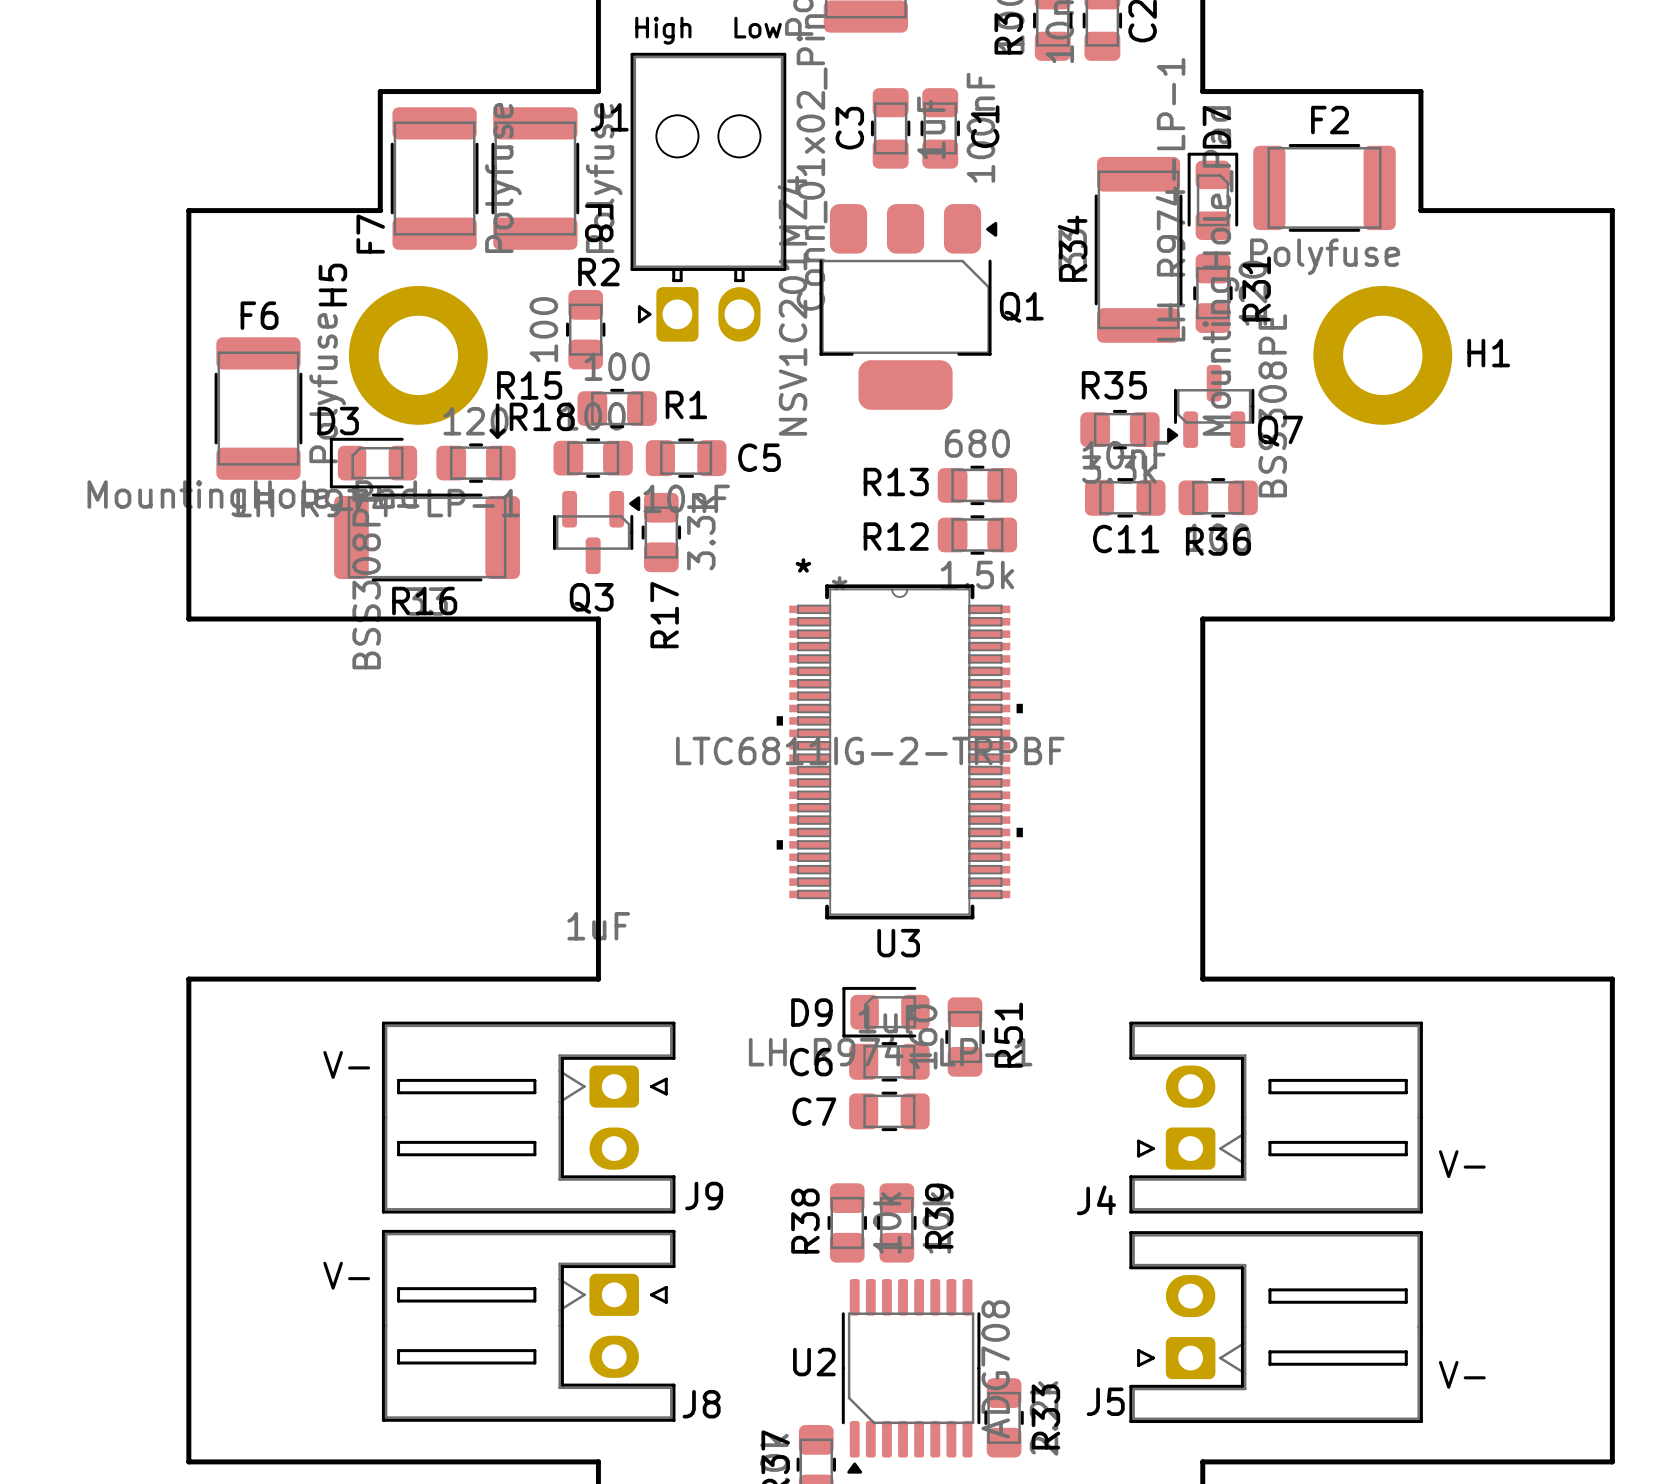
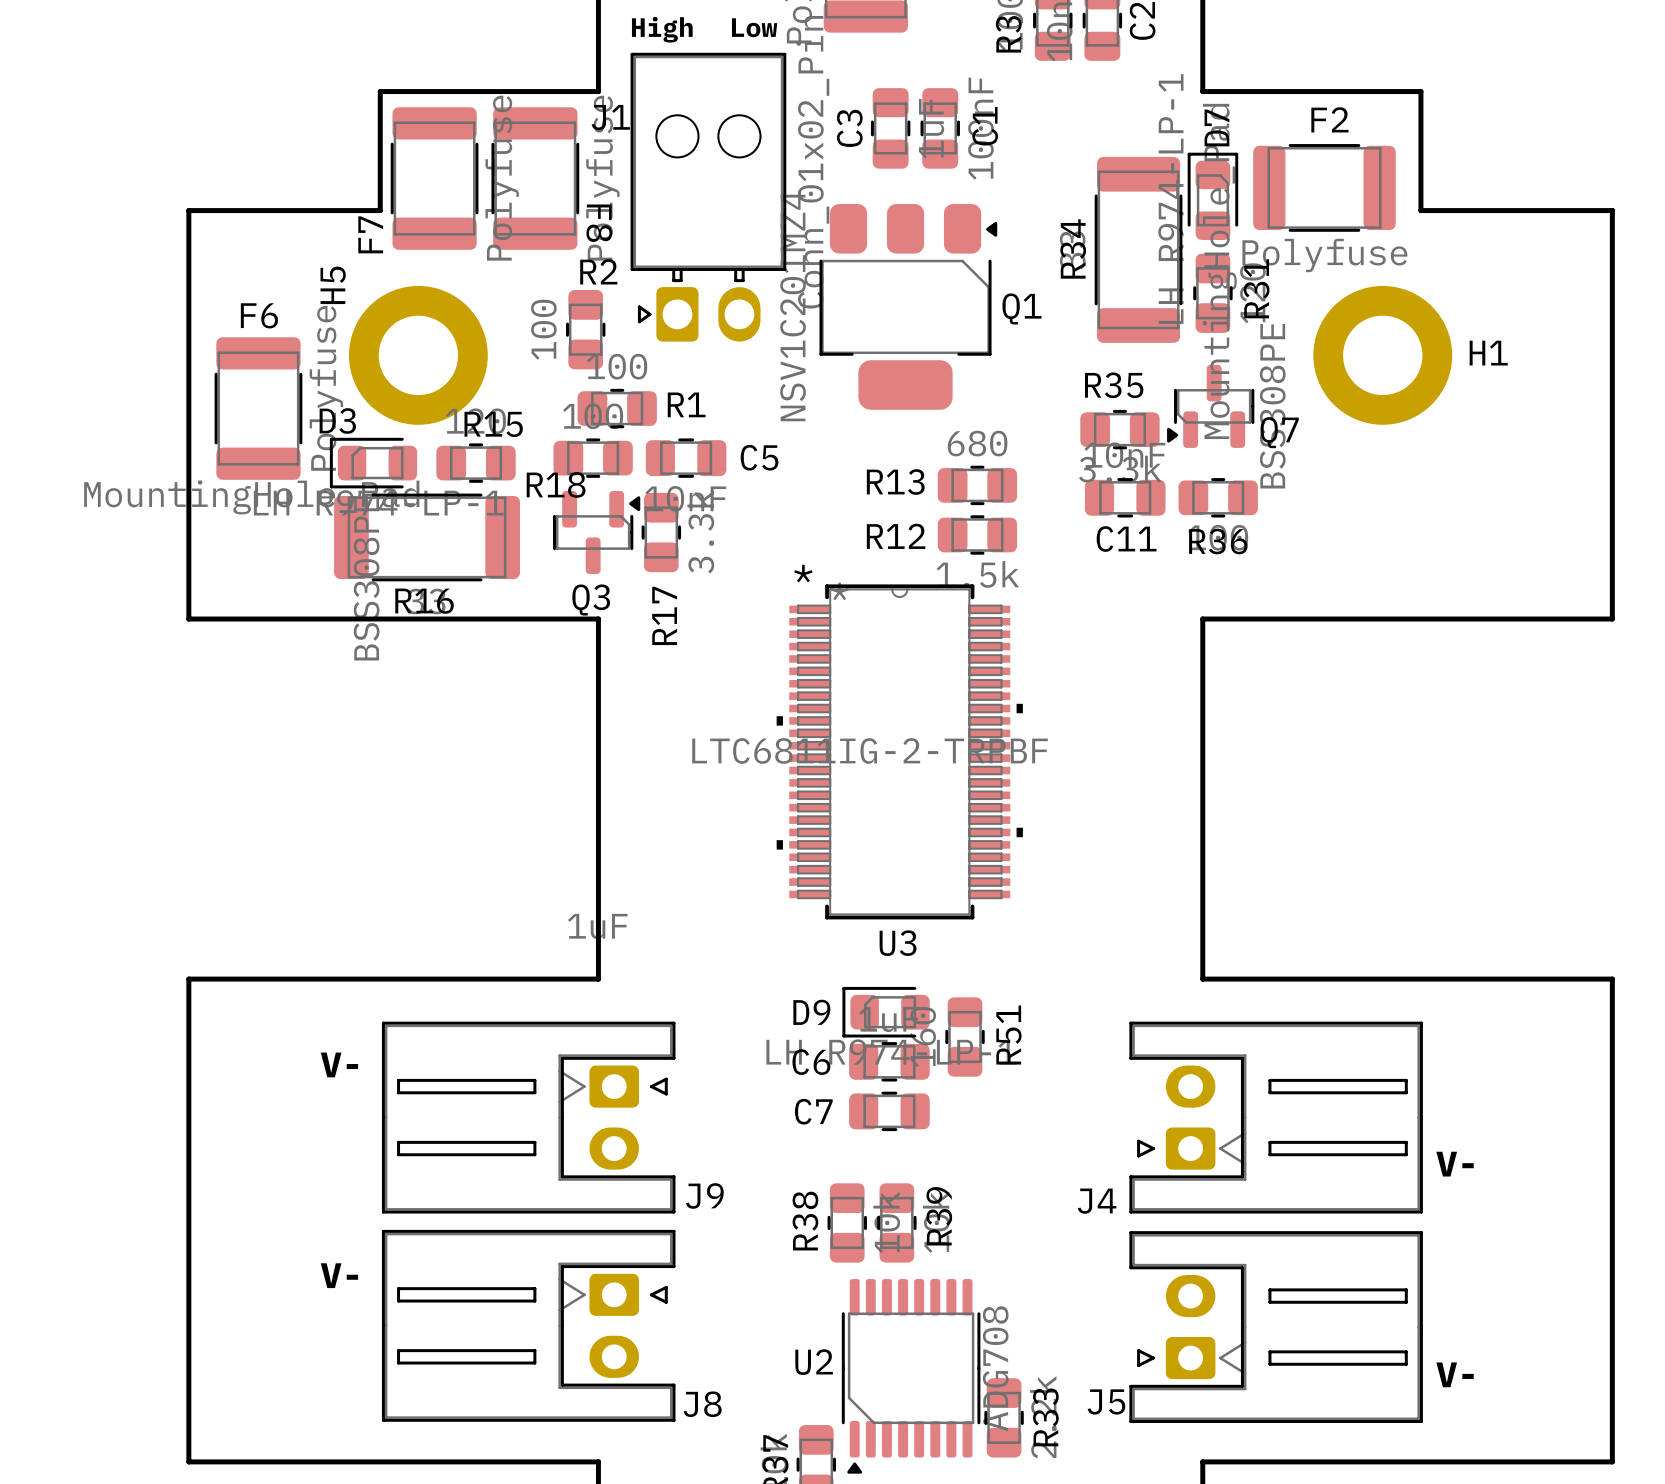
R15 name position: R15 (529, 385) -> R15 (493, 424)
line: (497, 405) (497, 436) -> none
R18 name position: R18 (542, 416) -> R18 (556, 484)
line: (491, 430) (497, 436) -> none
line: (503, 430) (497, 436) -> none

